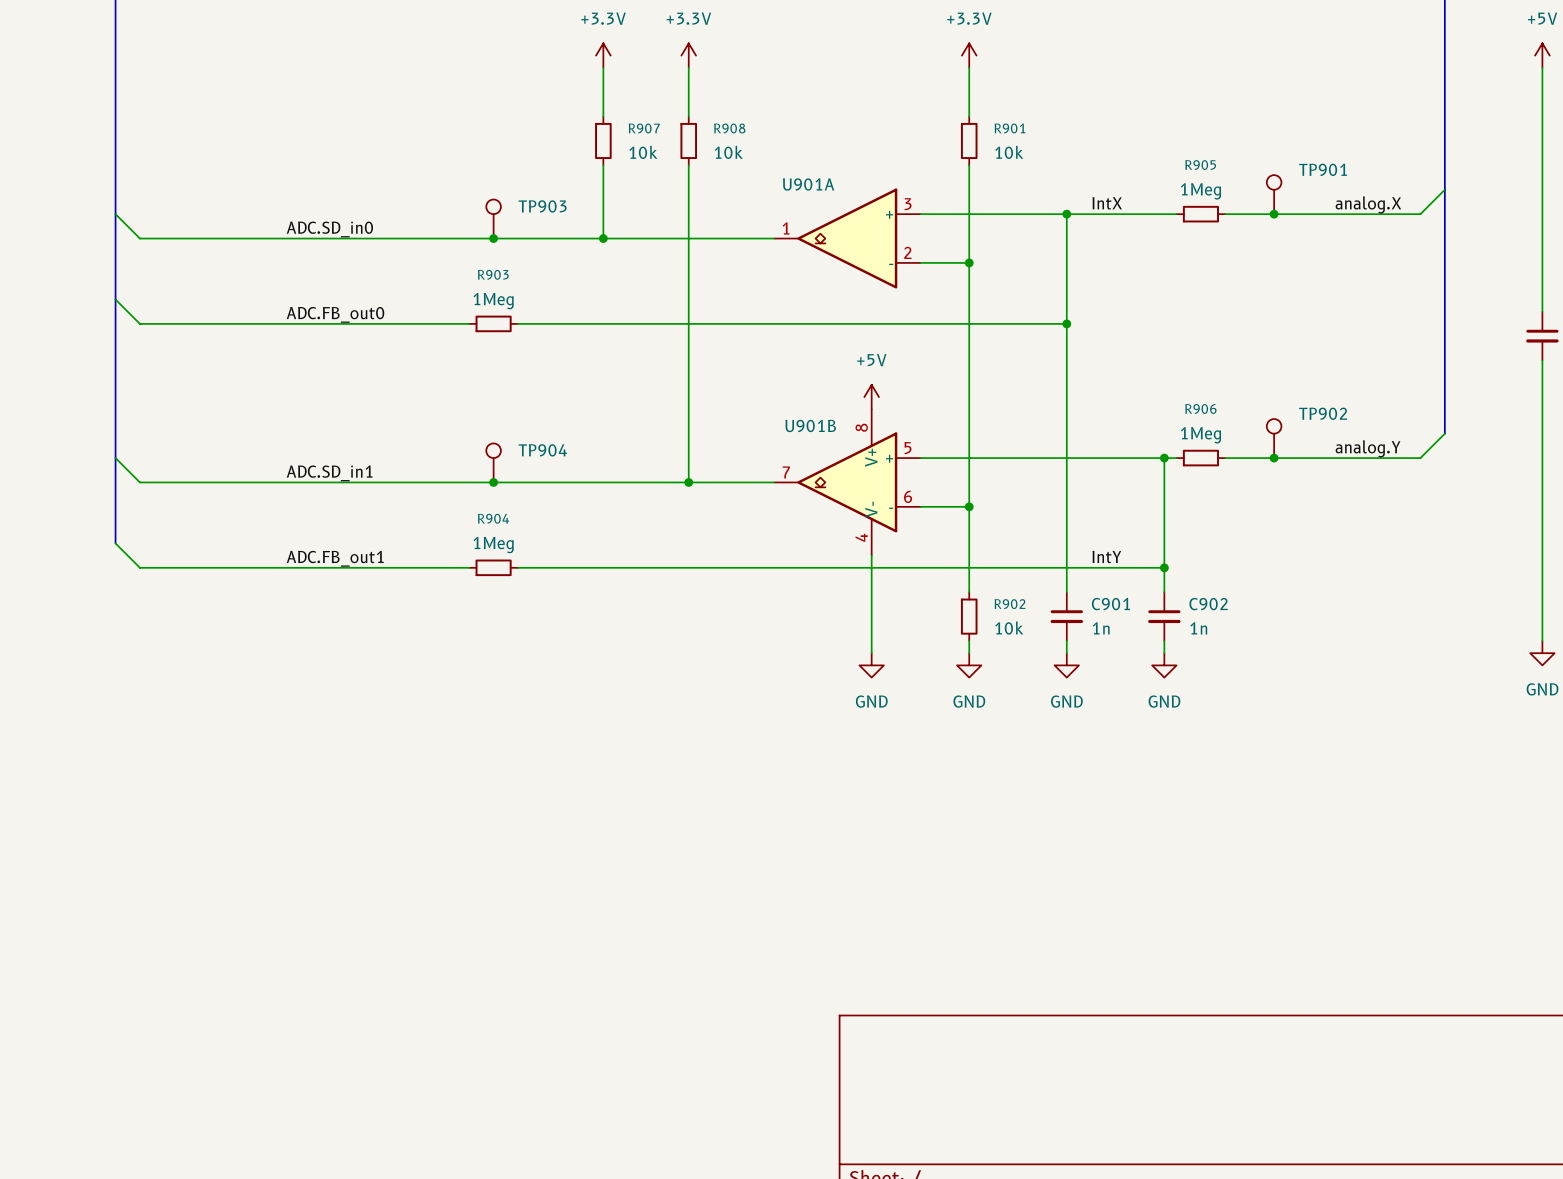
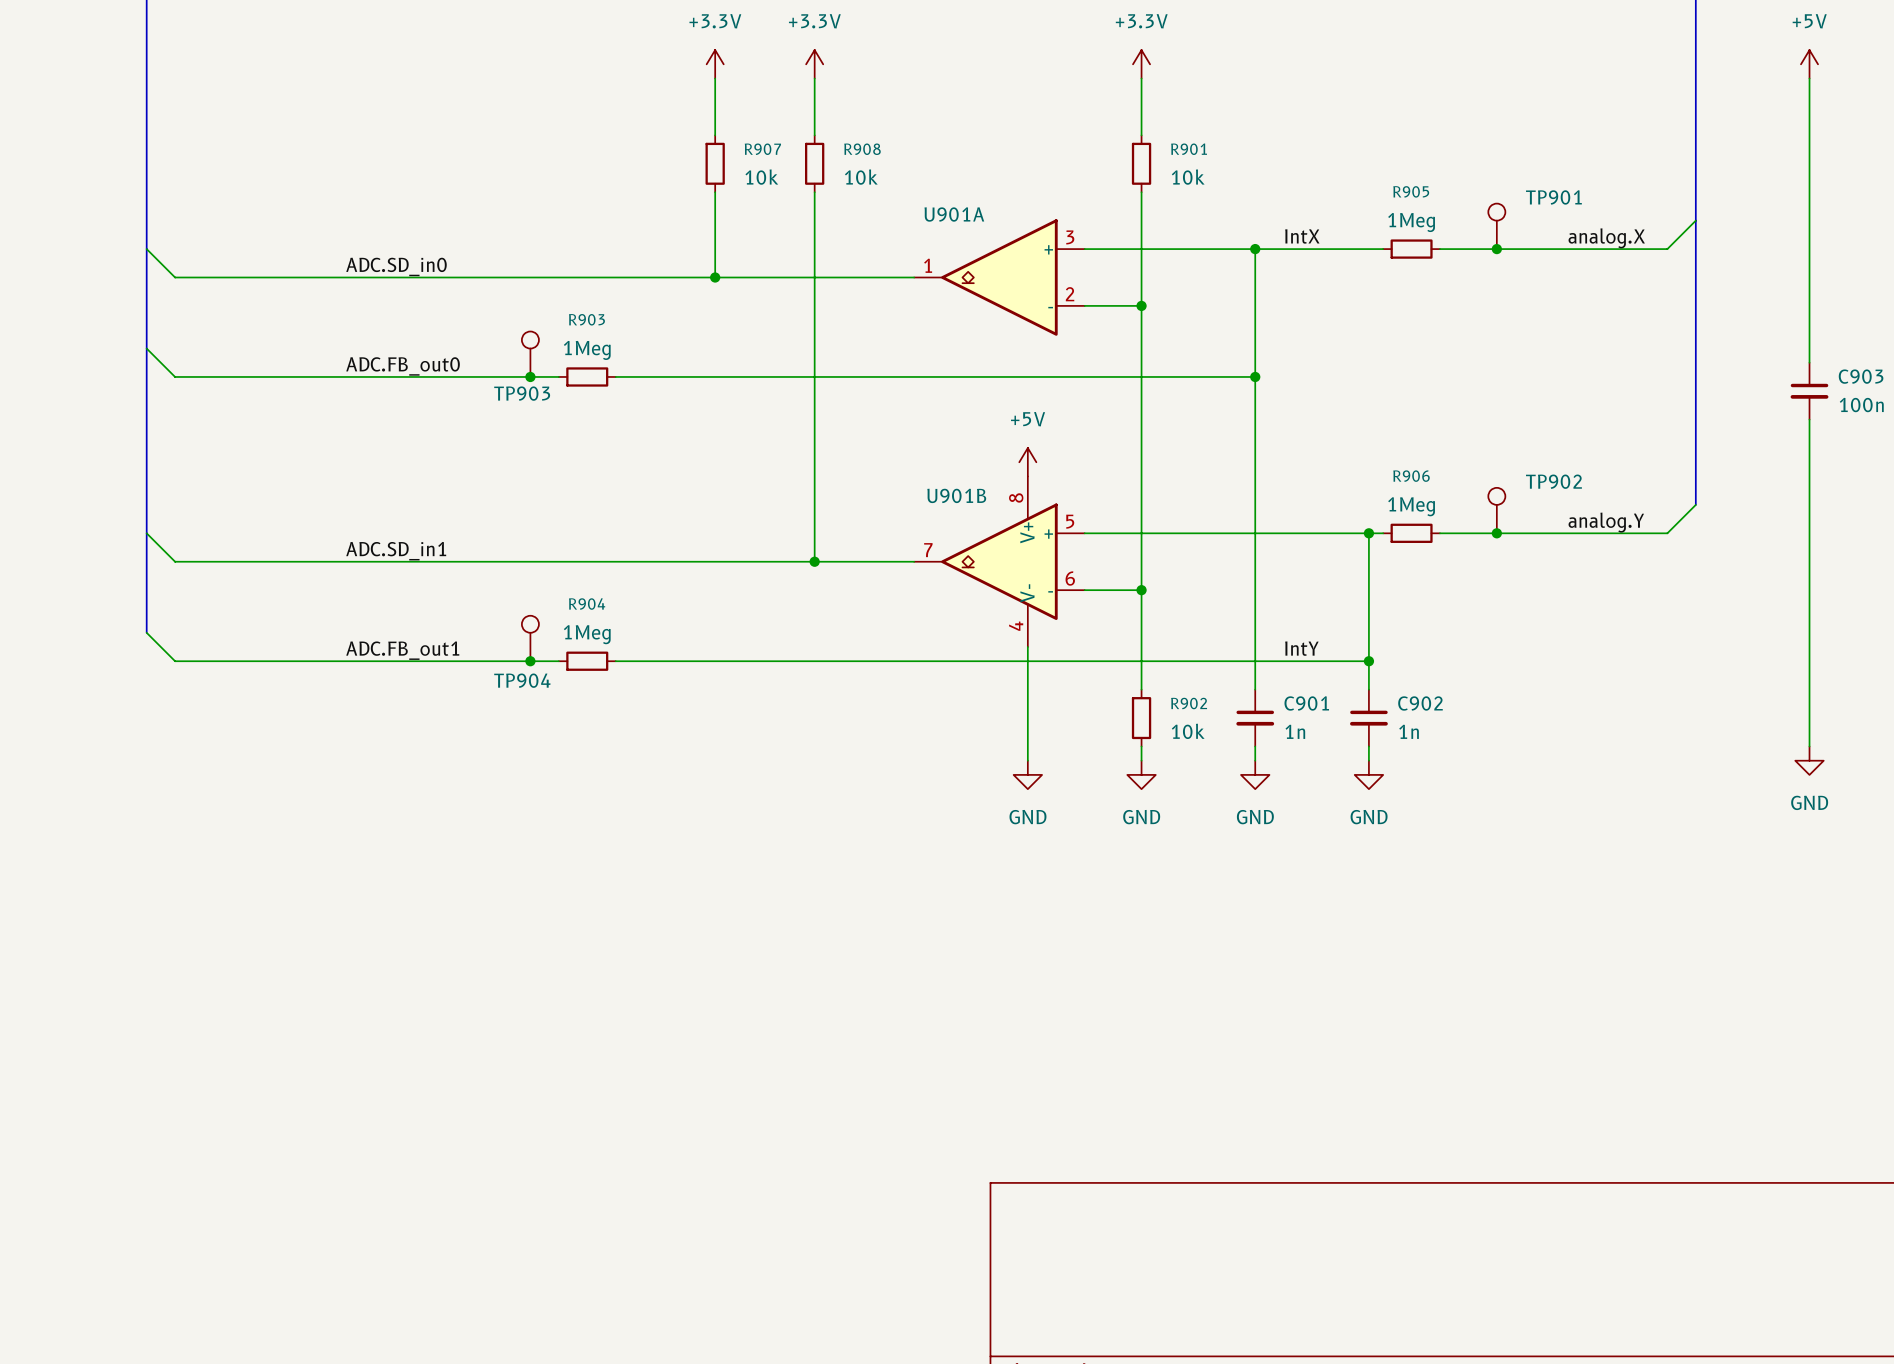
TP903 name position: TP903 (542, 206) -> TP903 (522, 393)
TP903 position: (493, 219) -> (530, 354)
junction: (493, 238) -> none
junction: none -> (530, 376)
TP904 name position: TP904 (542, 450) -> TP904 (522, 680)
TP904 position: (493, 462) -> (530, 638)
junction: (493, 482) -> none
junction: none -> (530, 661)

